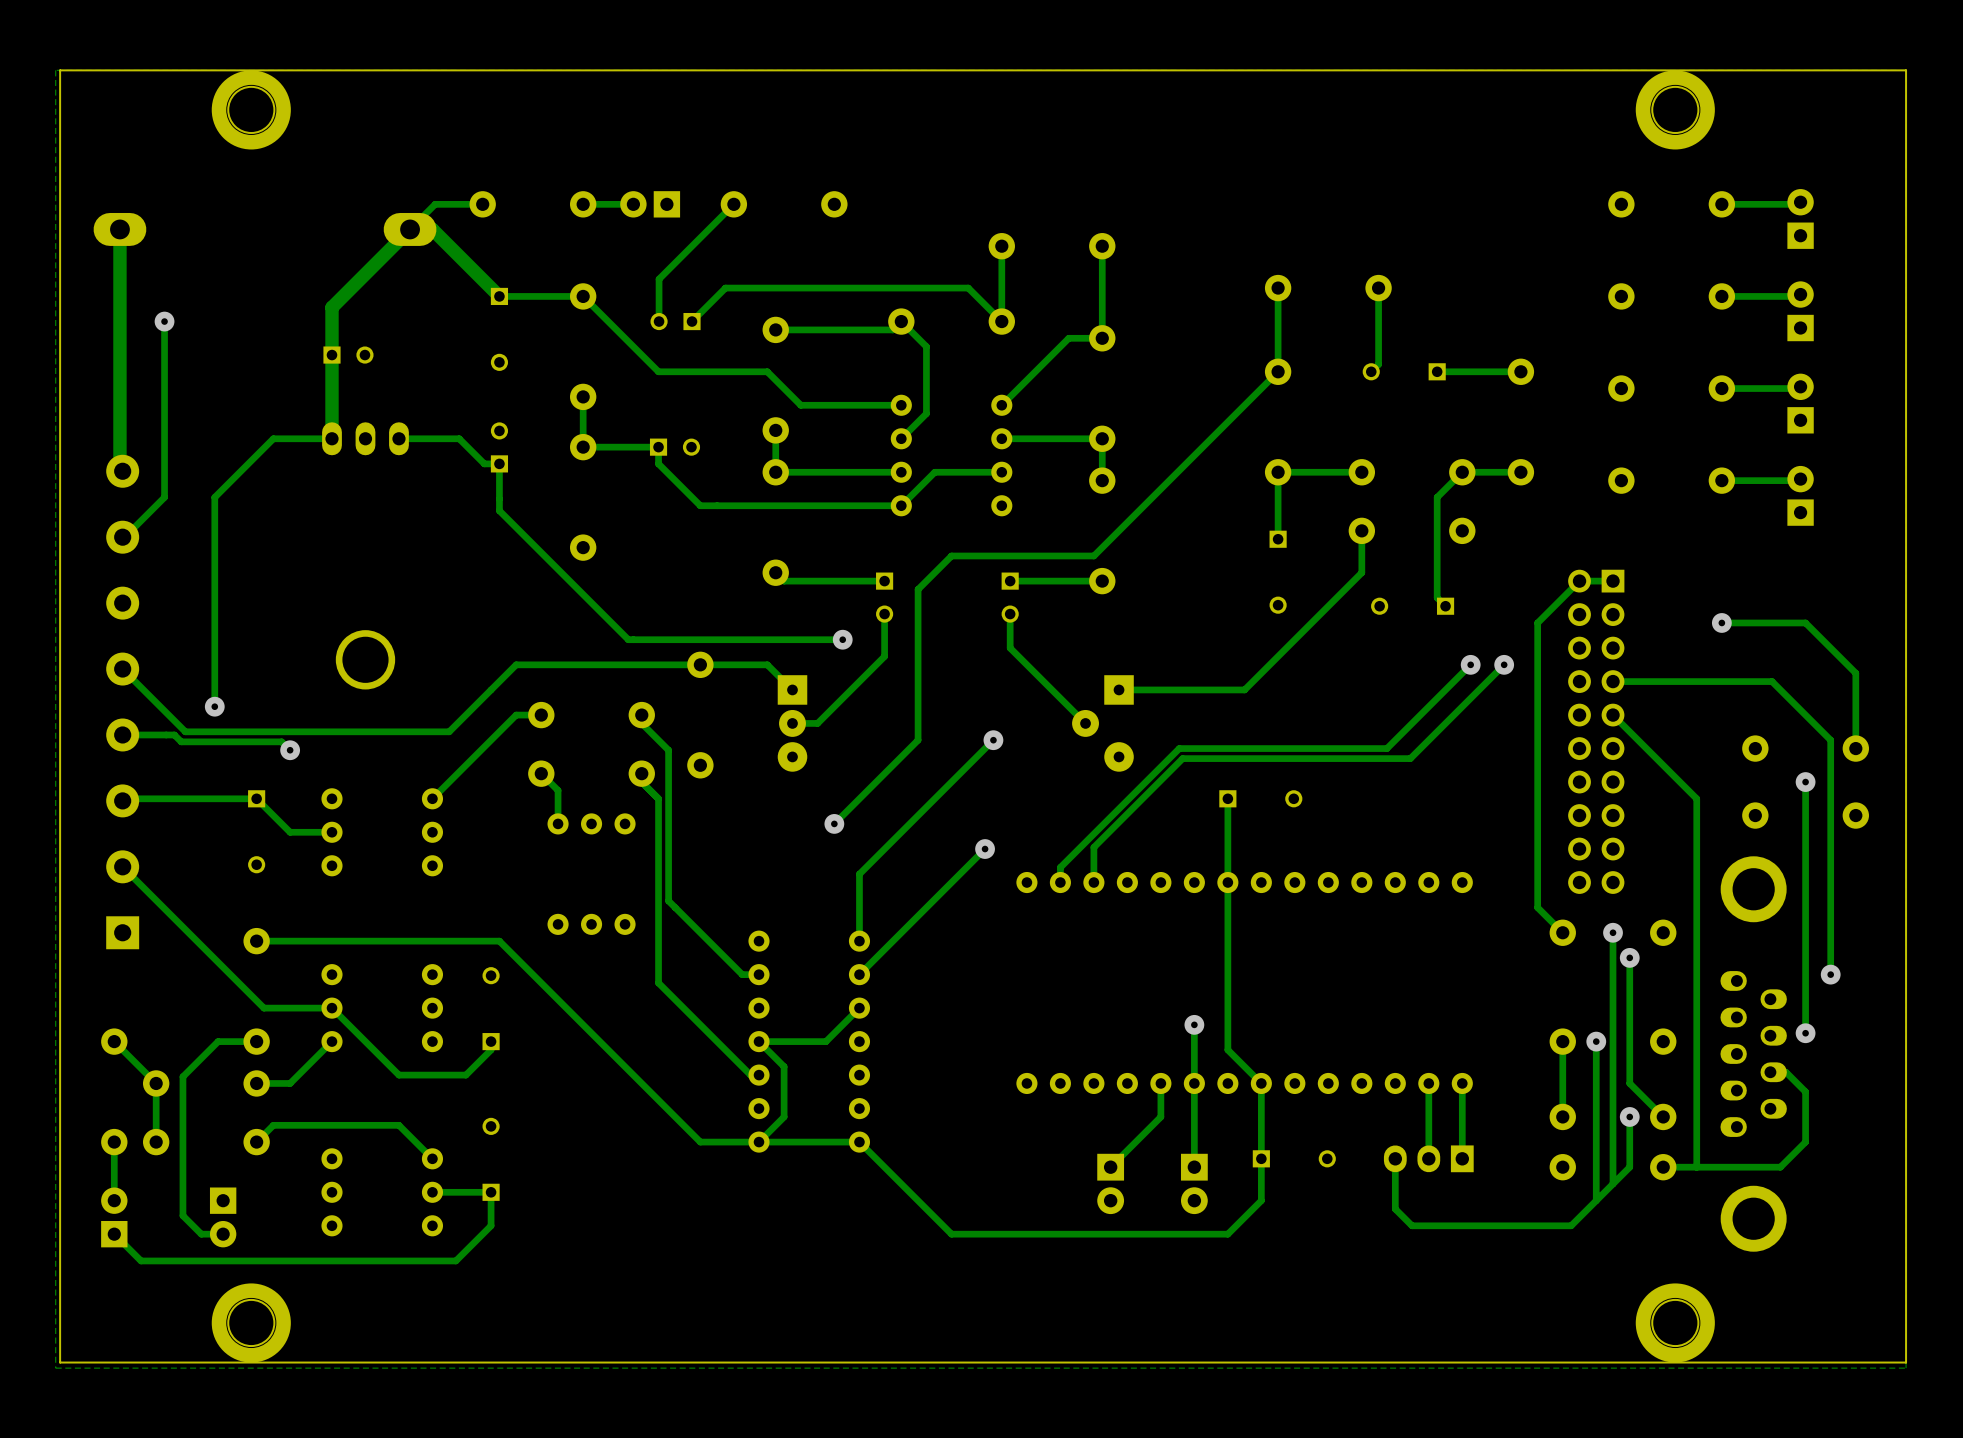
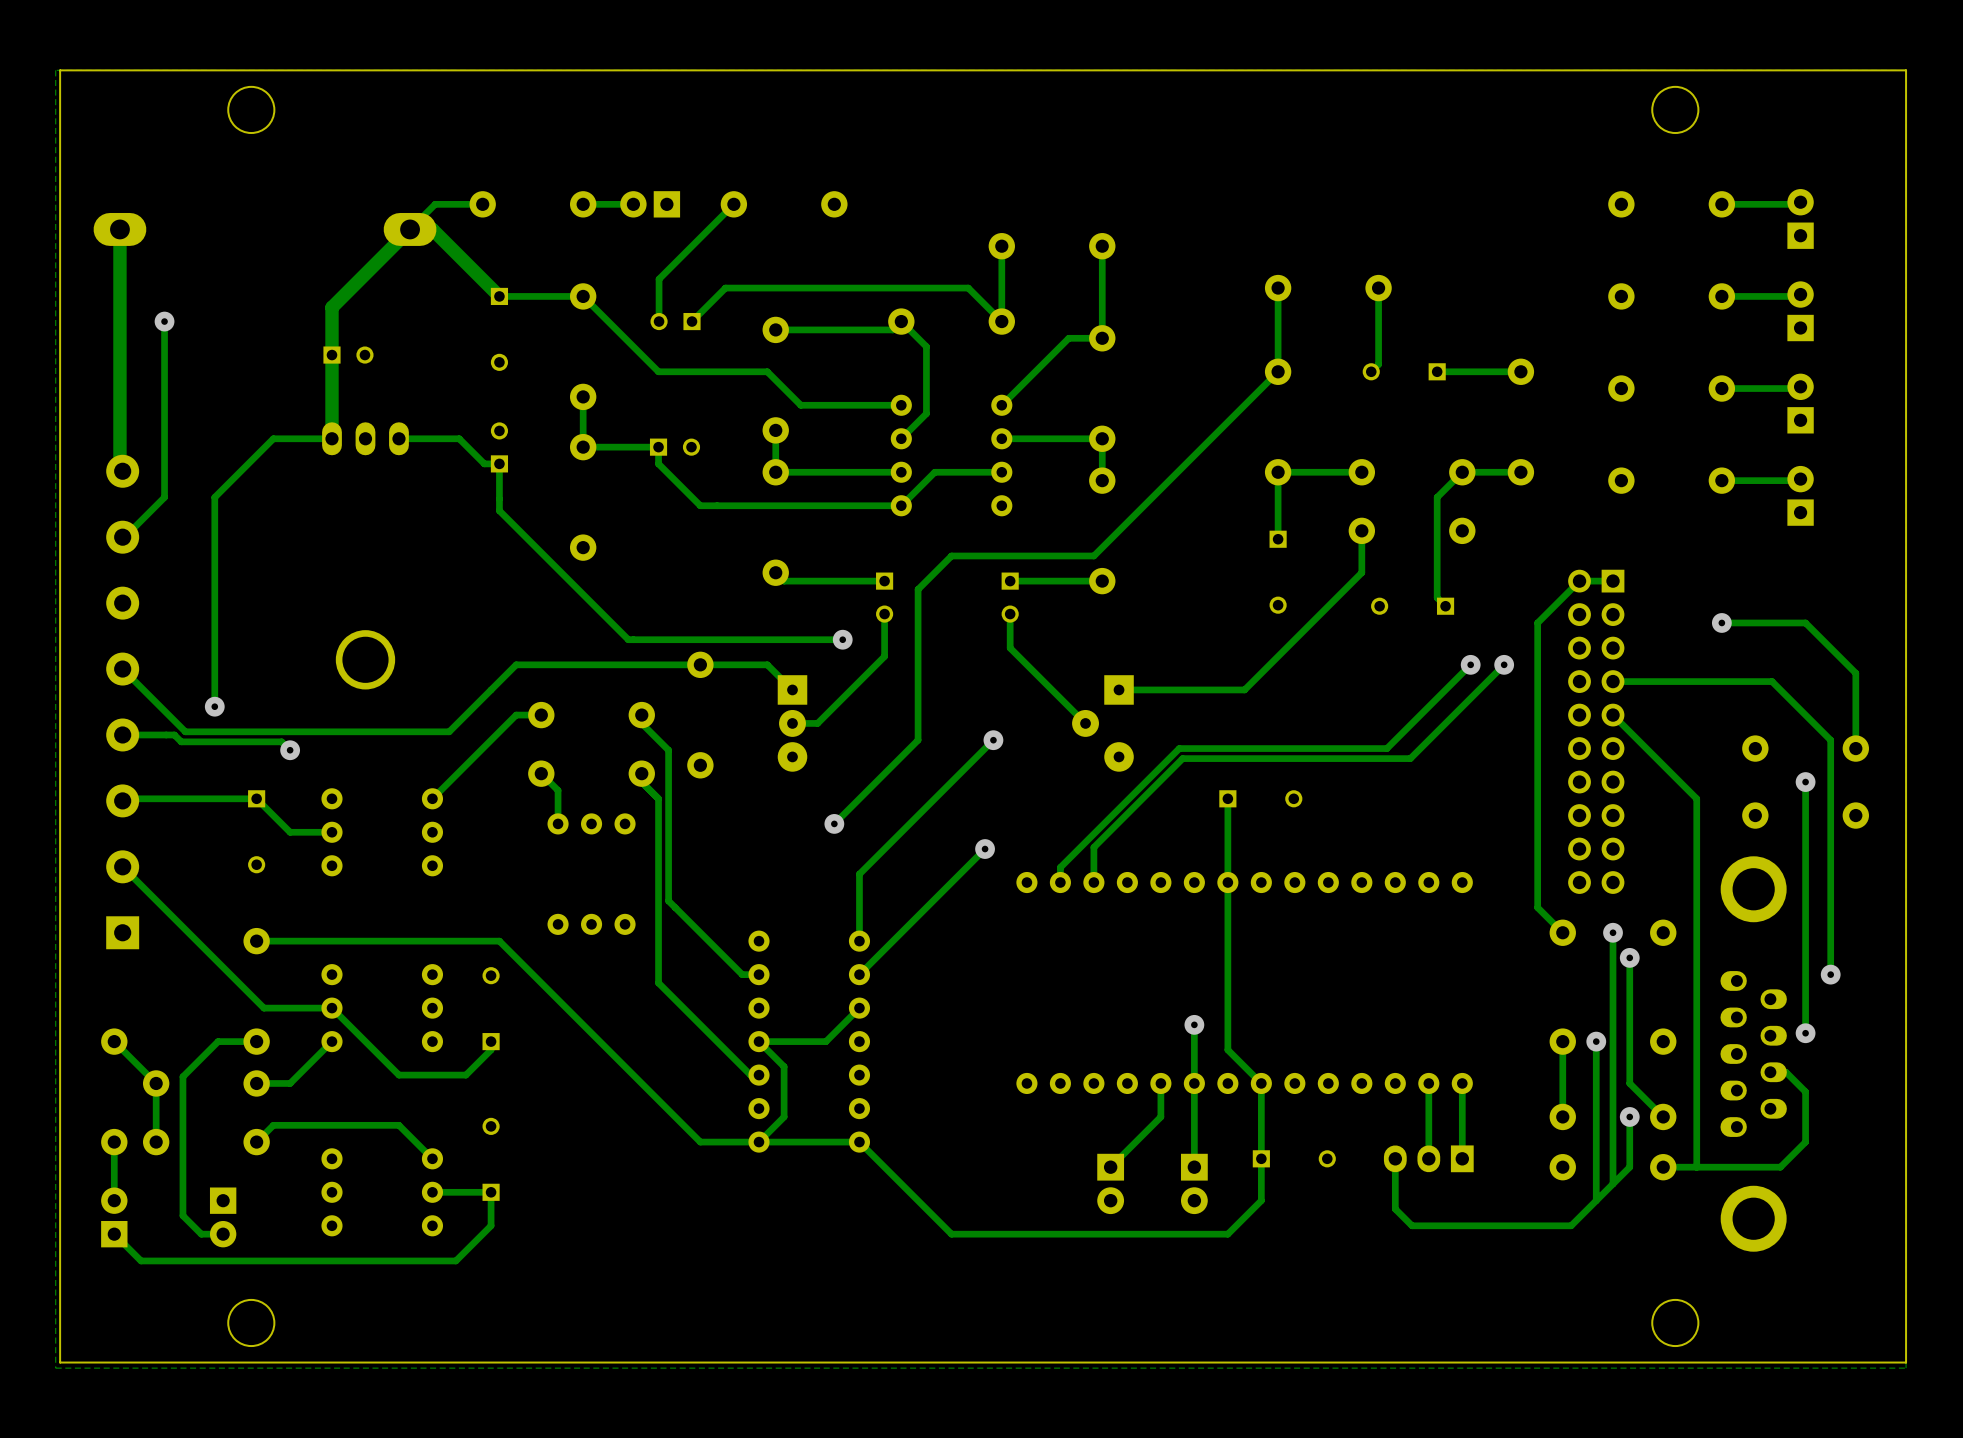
part: (251, 109) -> none
part: (1675, 109) -> none
part: (251, 1322) -> none
part: (1675, 1322) -> none

